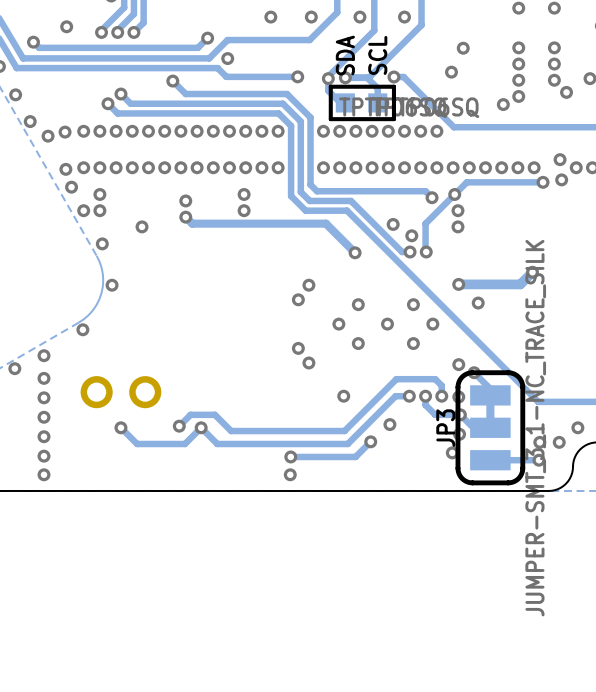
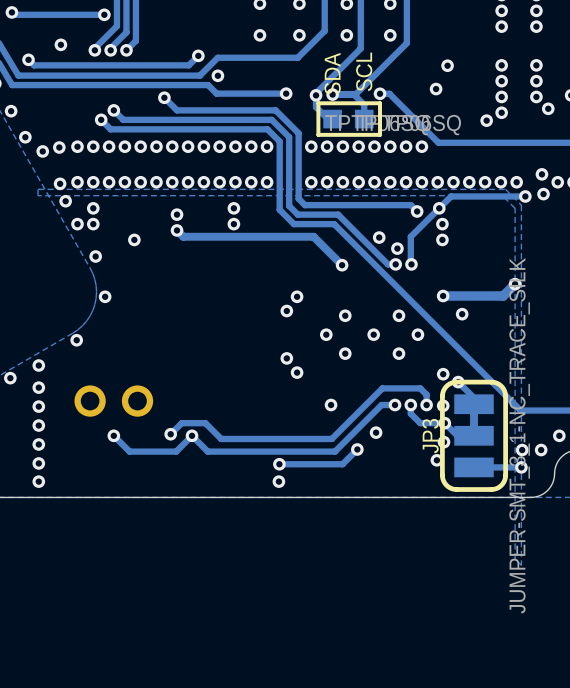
zone outline: none -> (505, 189) (37, 189) (37, 195) (502, 195) (515, 208) (515, 559) (521, 565) (521, 205) (505, 189)

